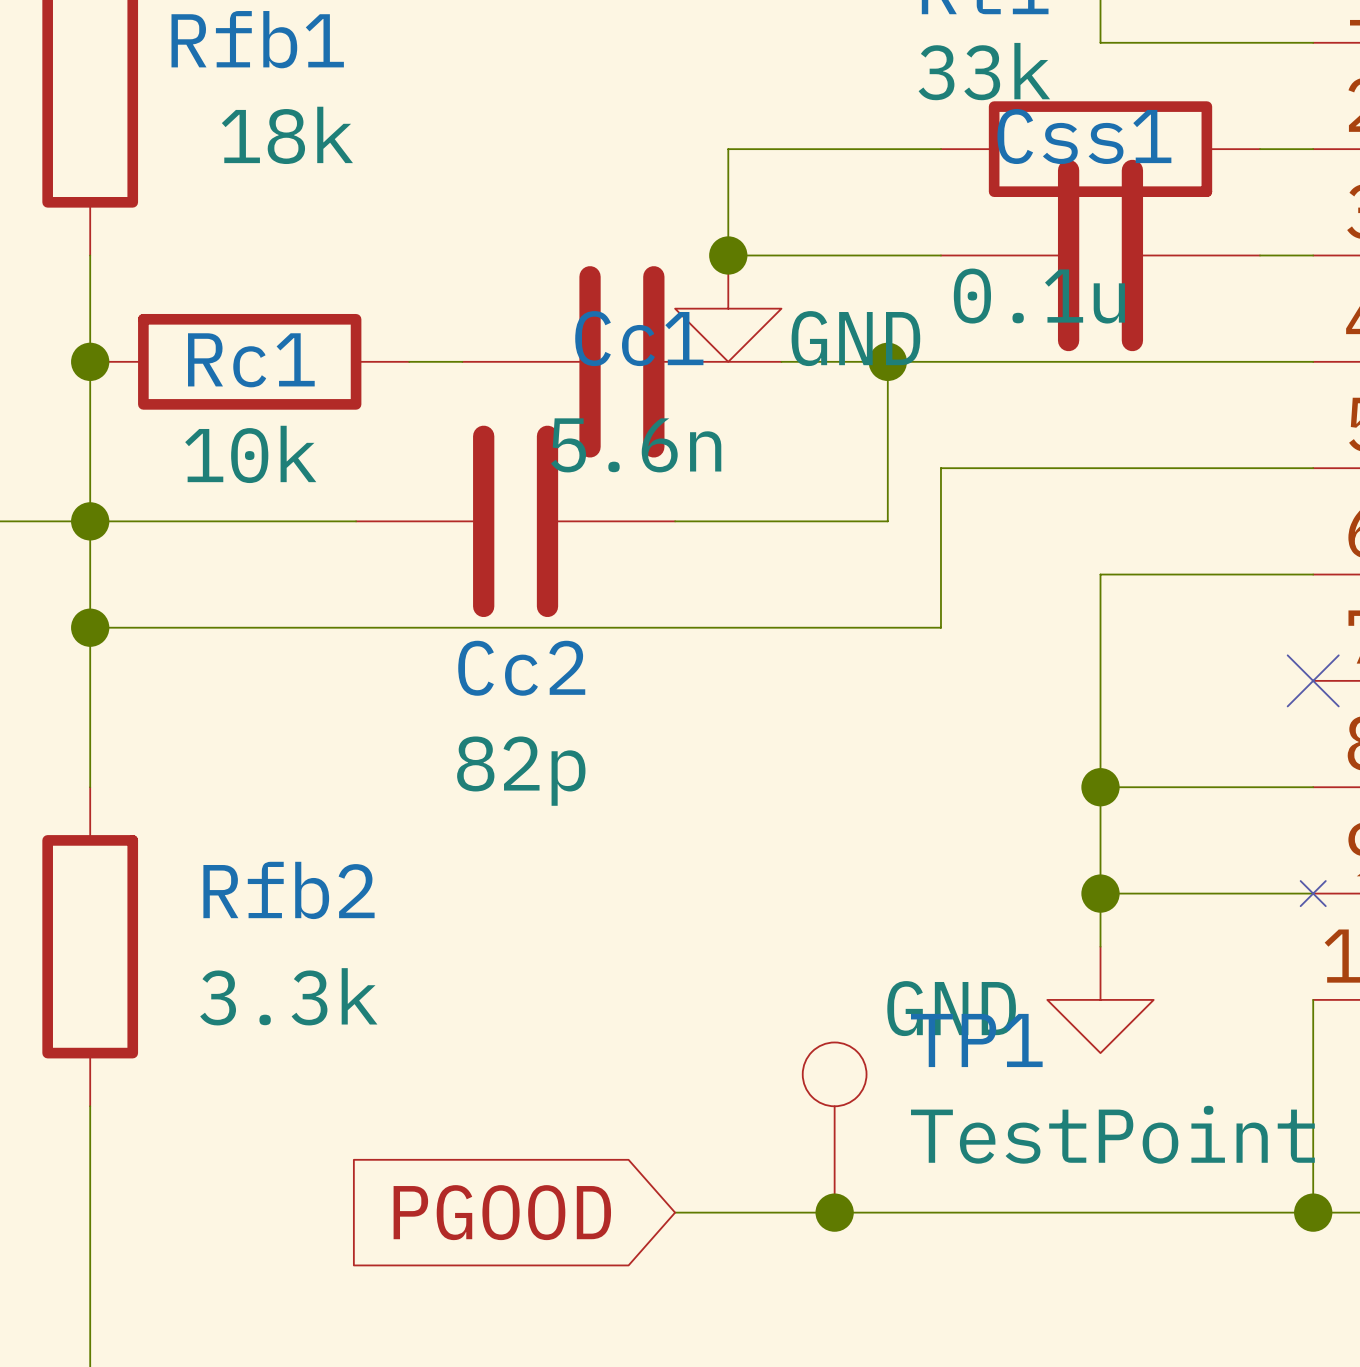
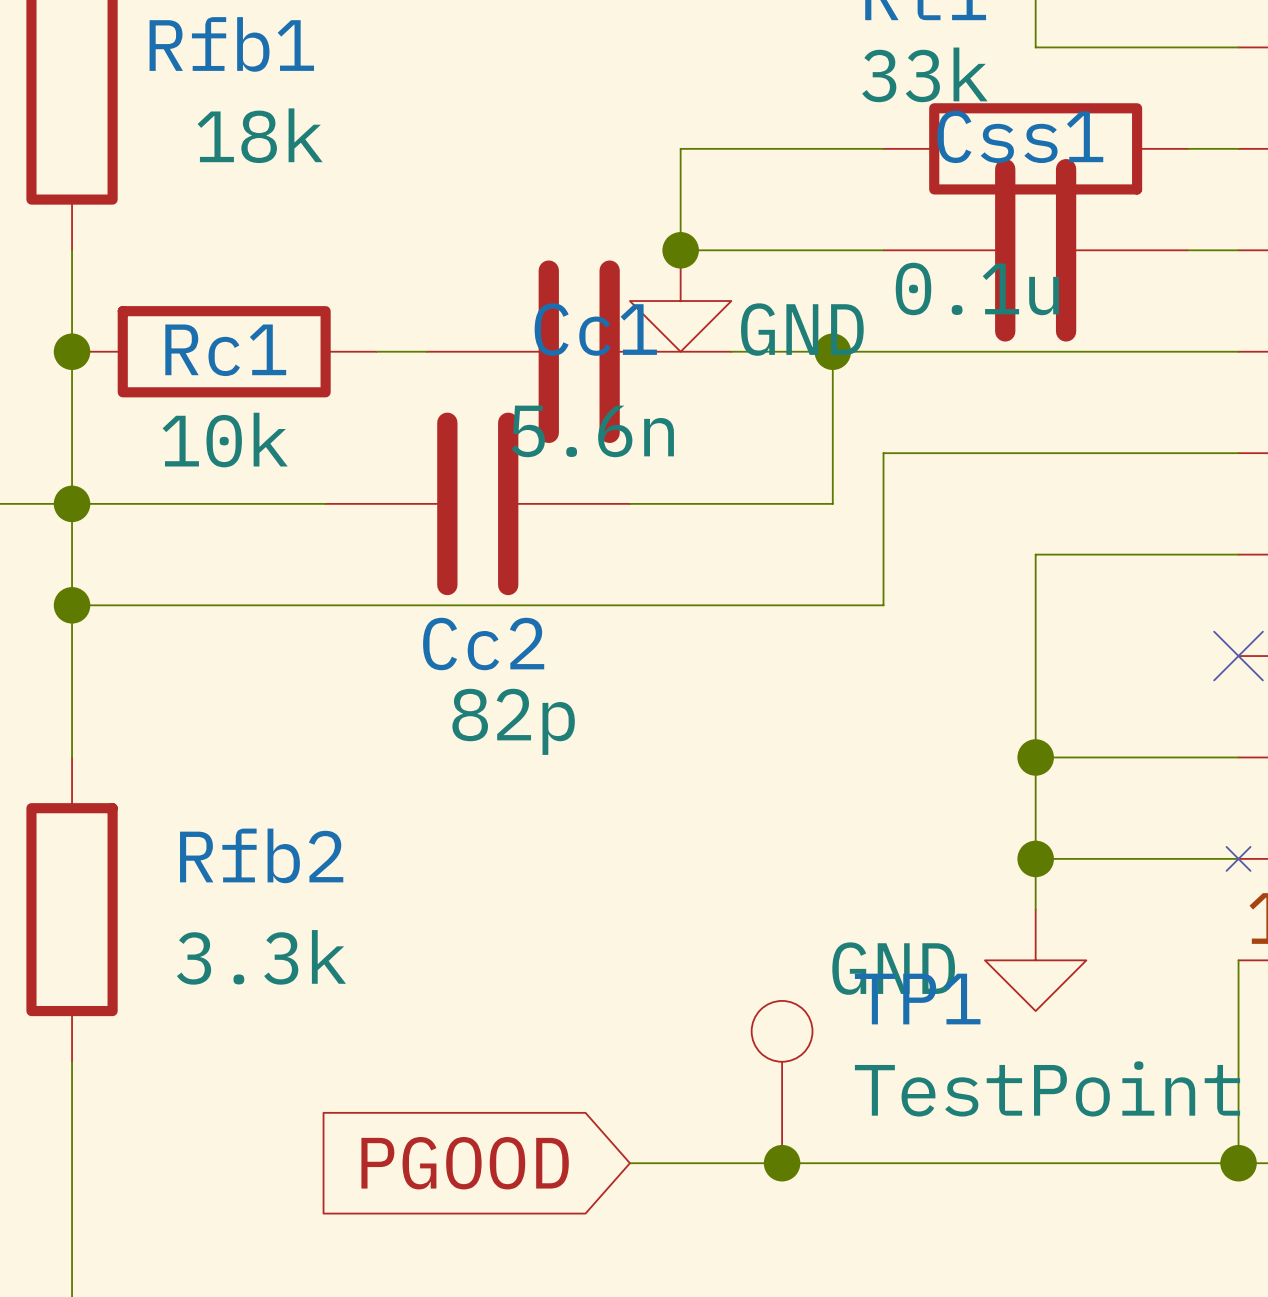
Cc2 value position: 82p (521, 771) -> 82p (513, 721)

